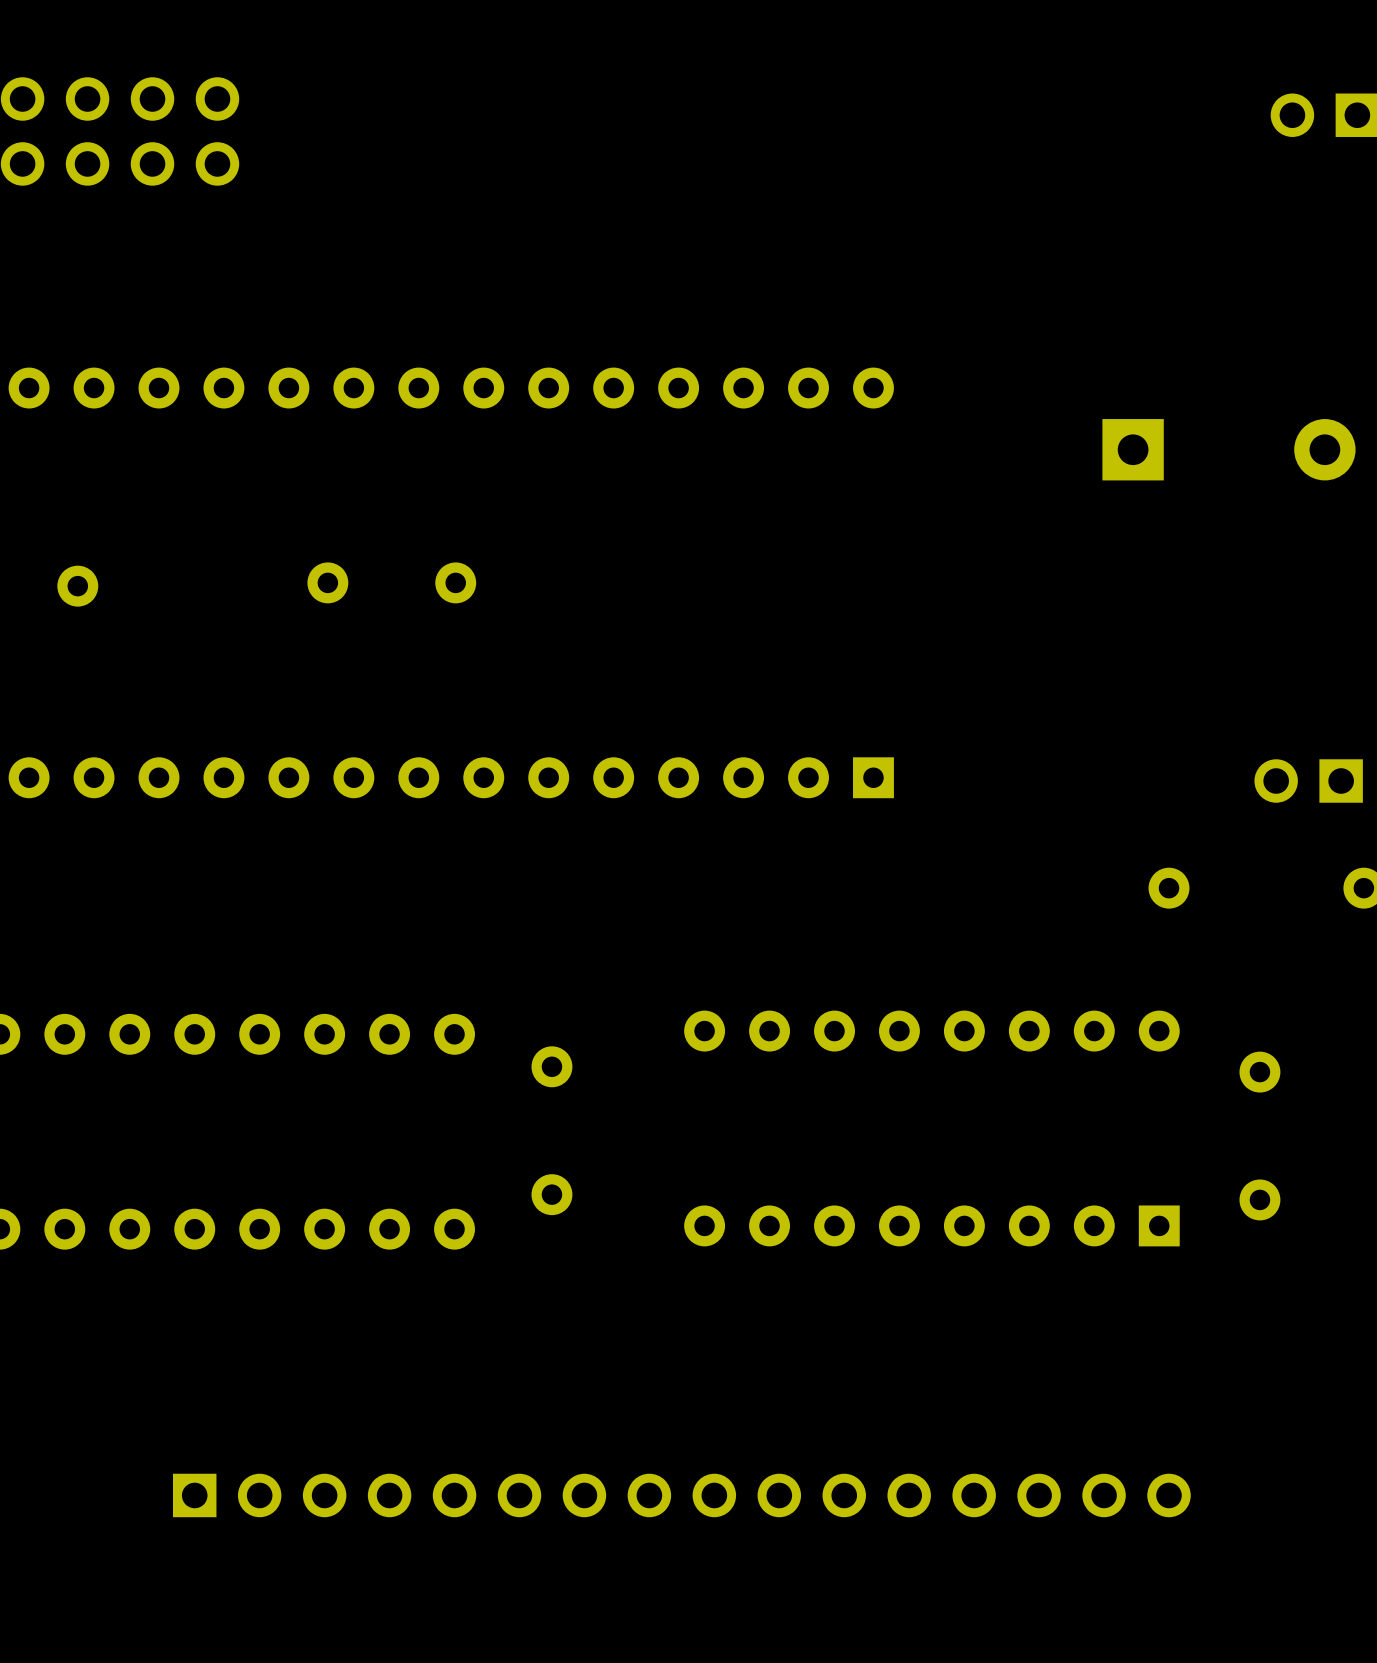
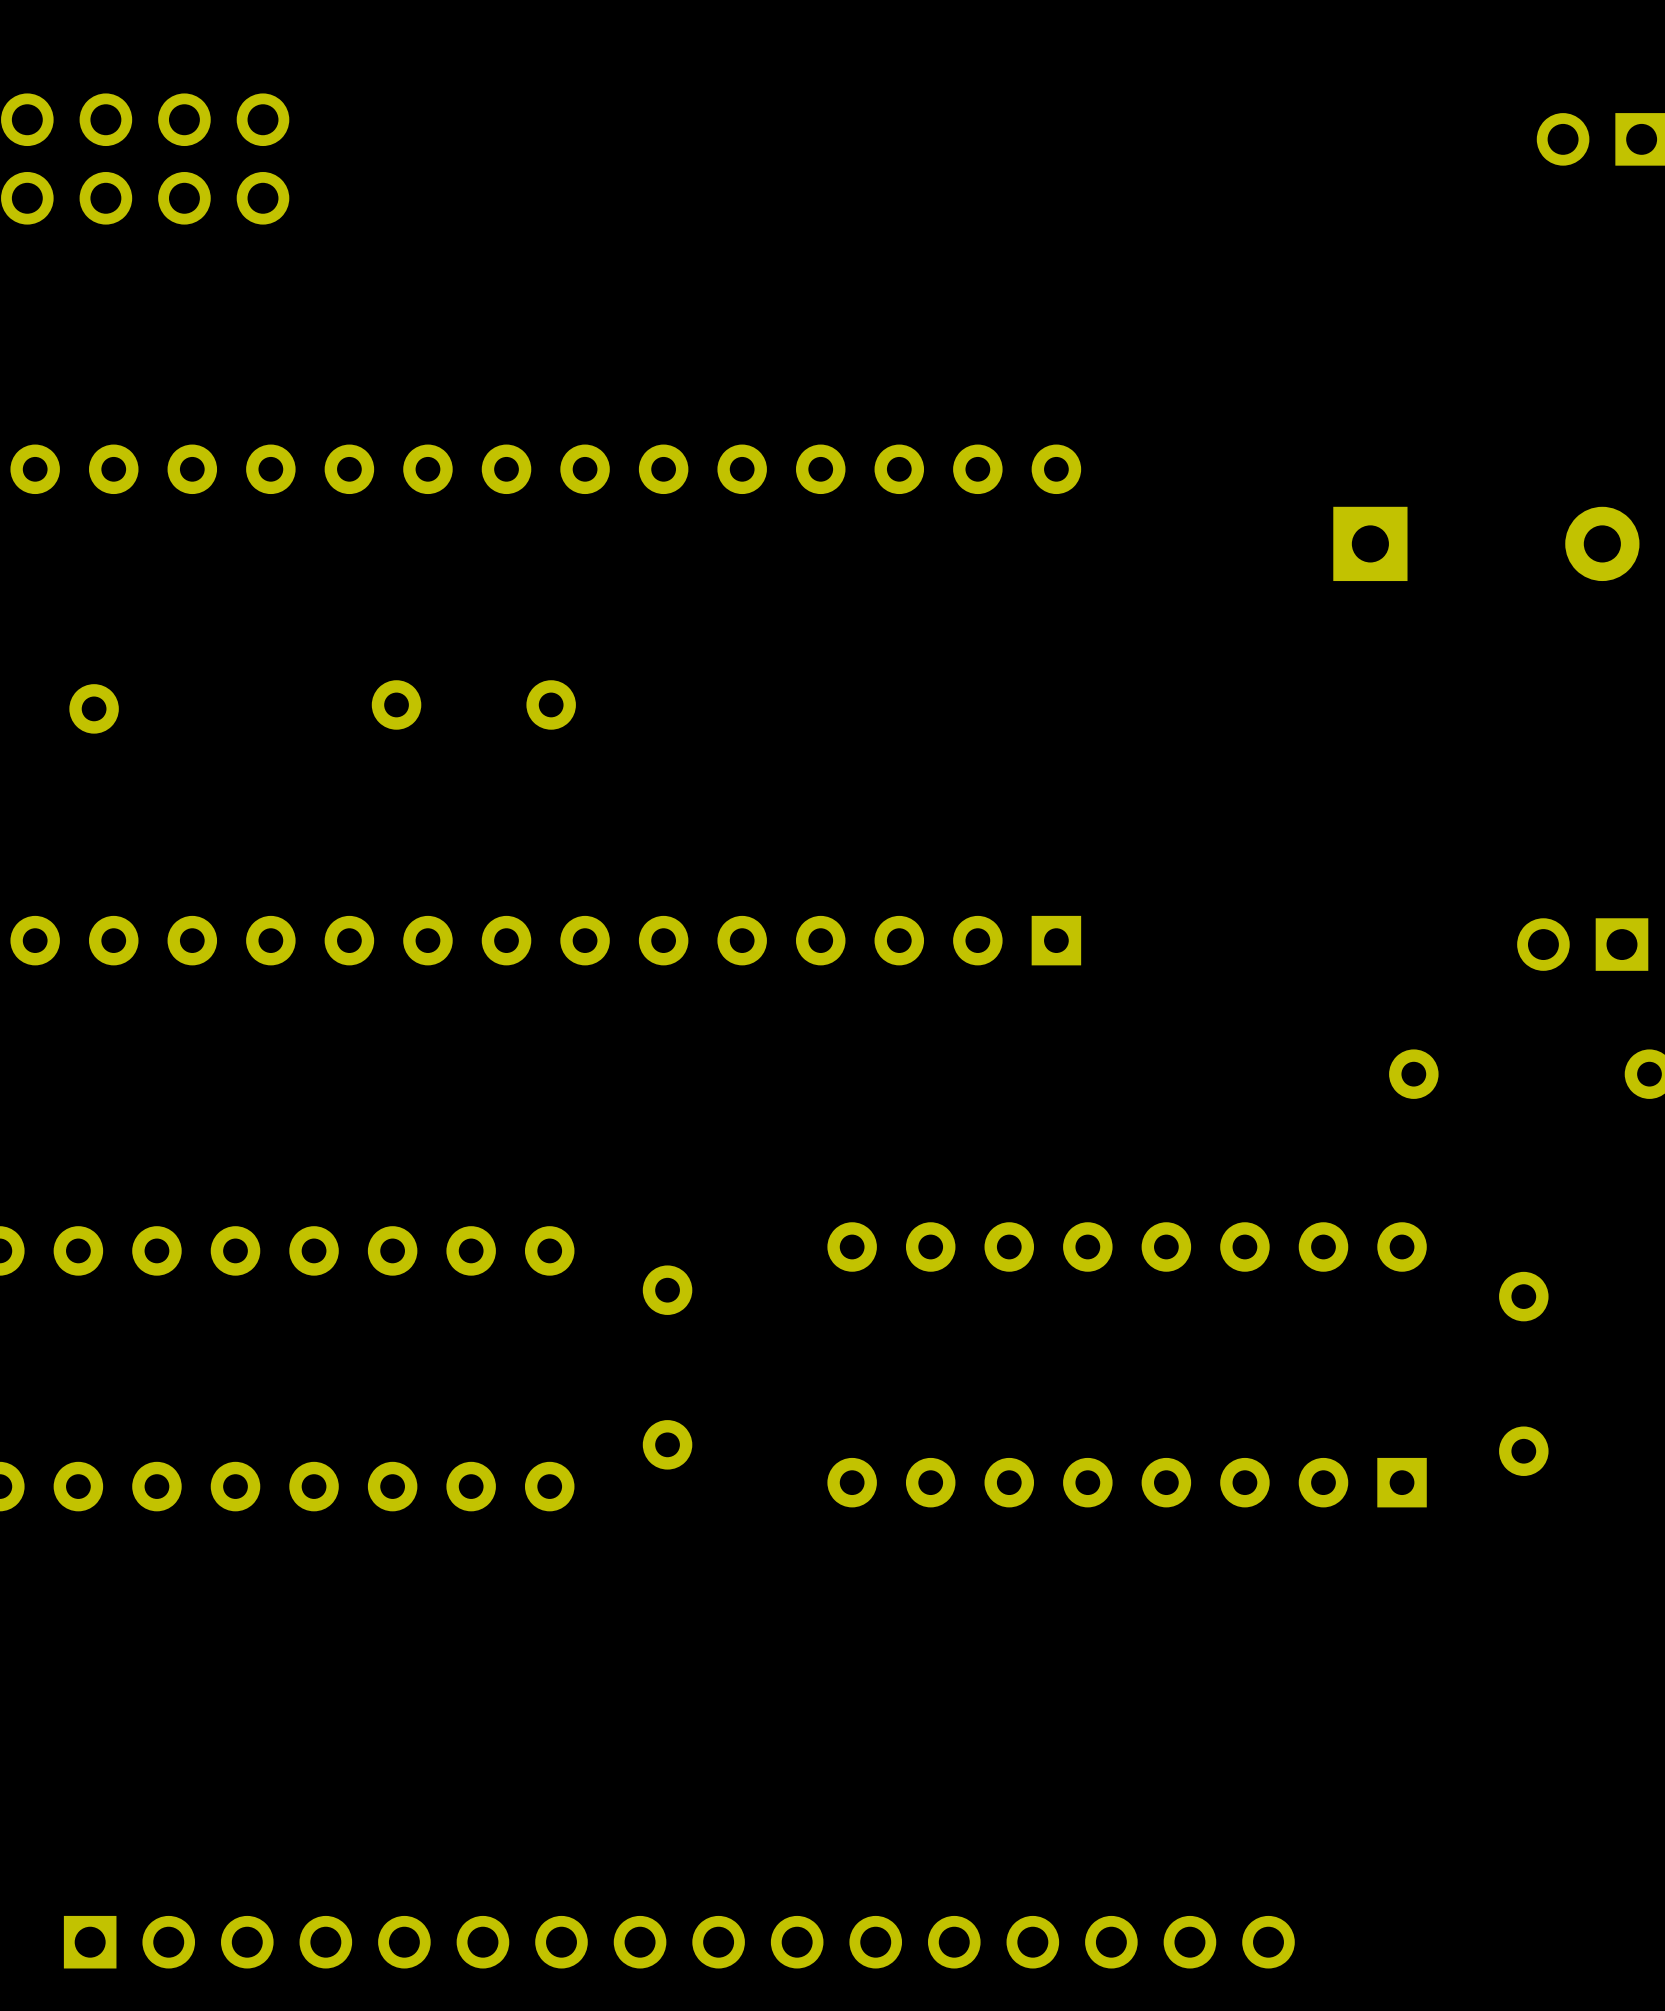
part position: (681, 1495) -> (679, 1942)

